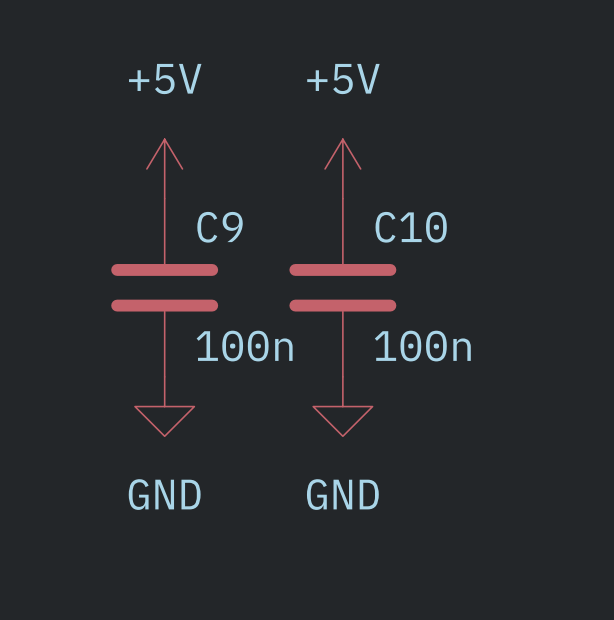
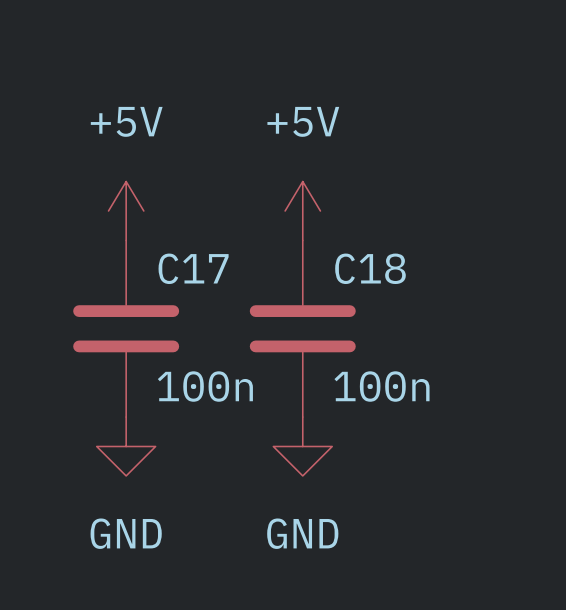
C9 name: C9 (220, 227) -> C17 (193, 268)
C10 name: C10 (411, 227) -> C18 (370, 268)

